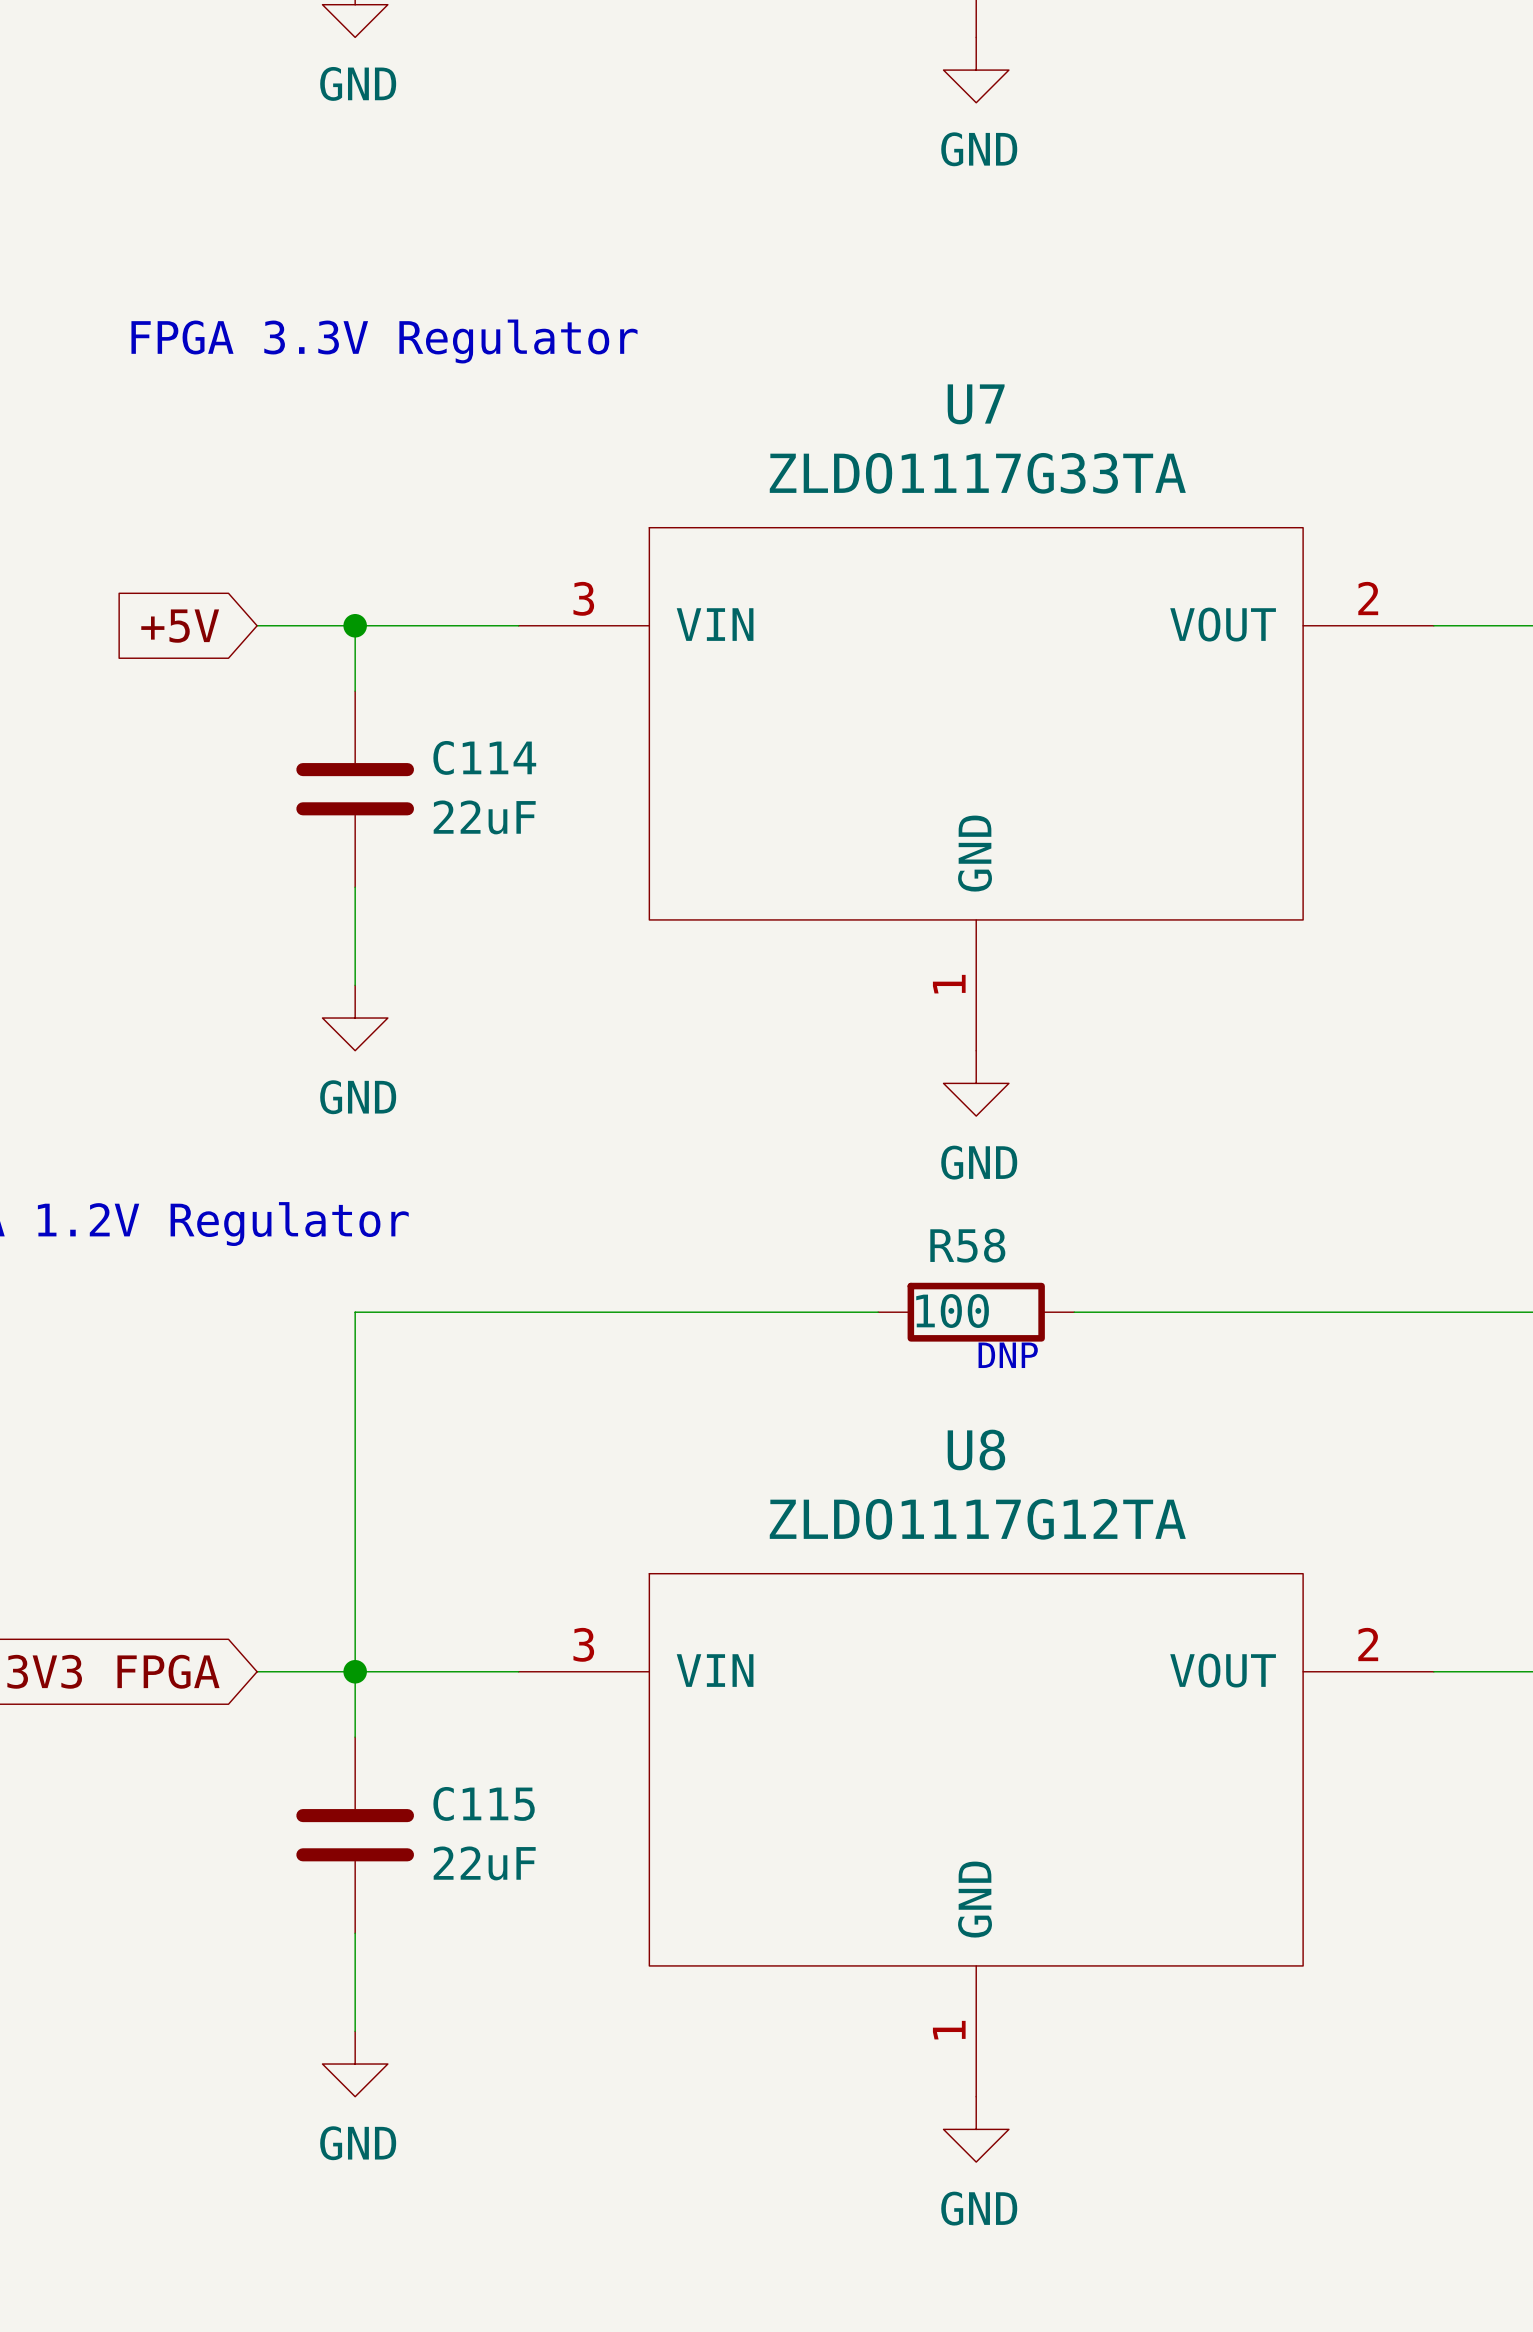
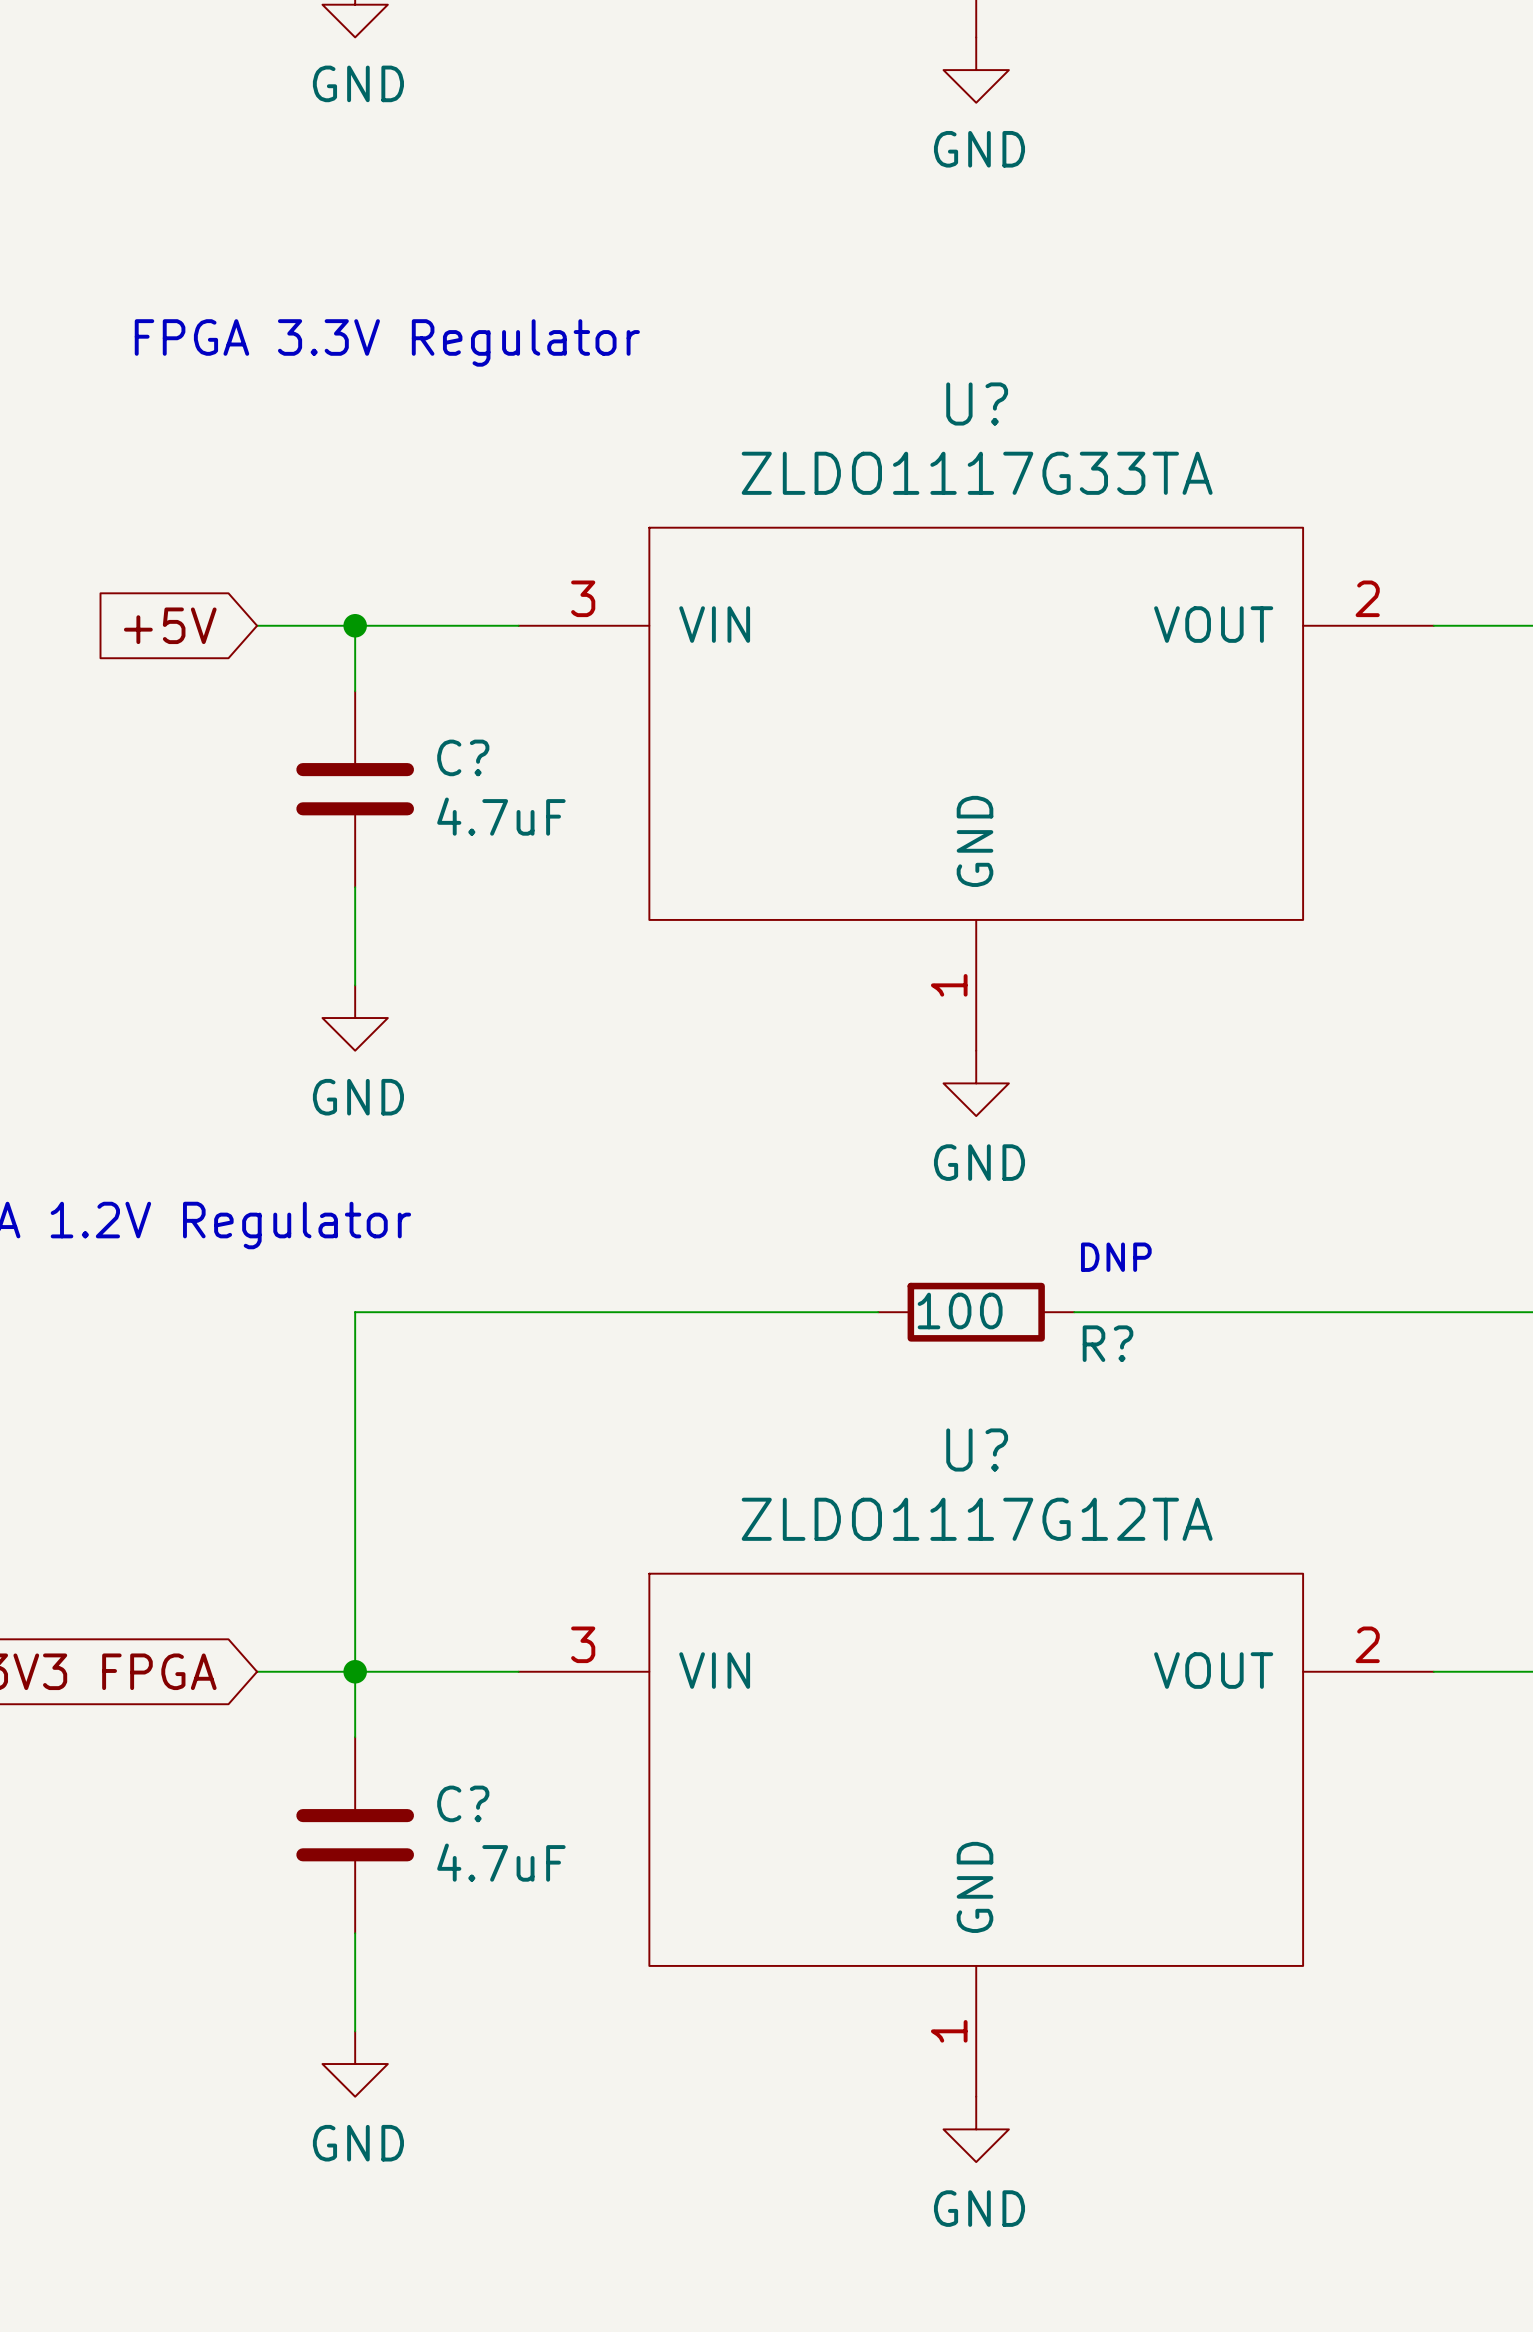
U7 name: U7 (976, 404) -> U? (977, 403)
C114 name: C114 (484, 757) -> C? (463, 757)
C114 value: 22uF (484, 817) -> 4.7uF (501, 816)
R58 name: R58 (967, 1245) -> R? (1108, 1343)
text position: DNP (1008, 1355) -> DNP (1116, 1257)
U8 name: U8 (976, 1450) -> U? (977, 1449)
C115 name: C115 (484, 1803) -> C? (463, 1803)
C115 value: 22uF (484, 1863) -> 4.7uF (501, 1862)

